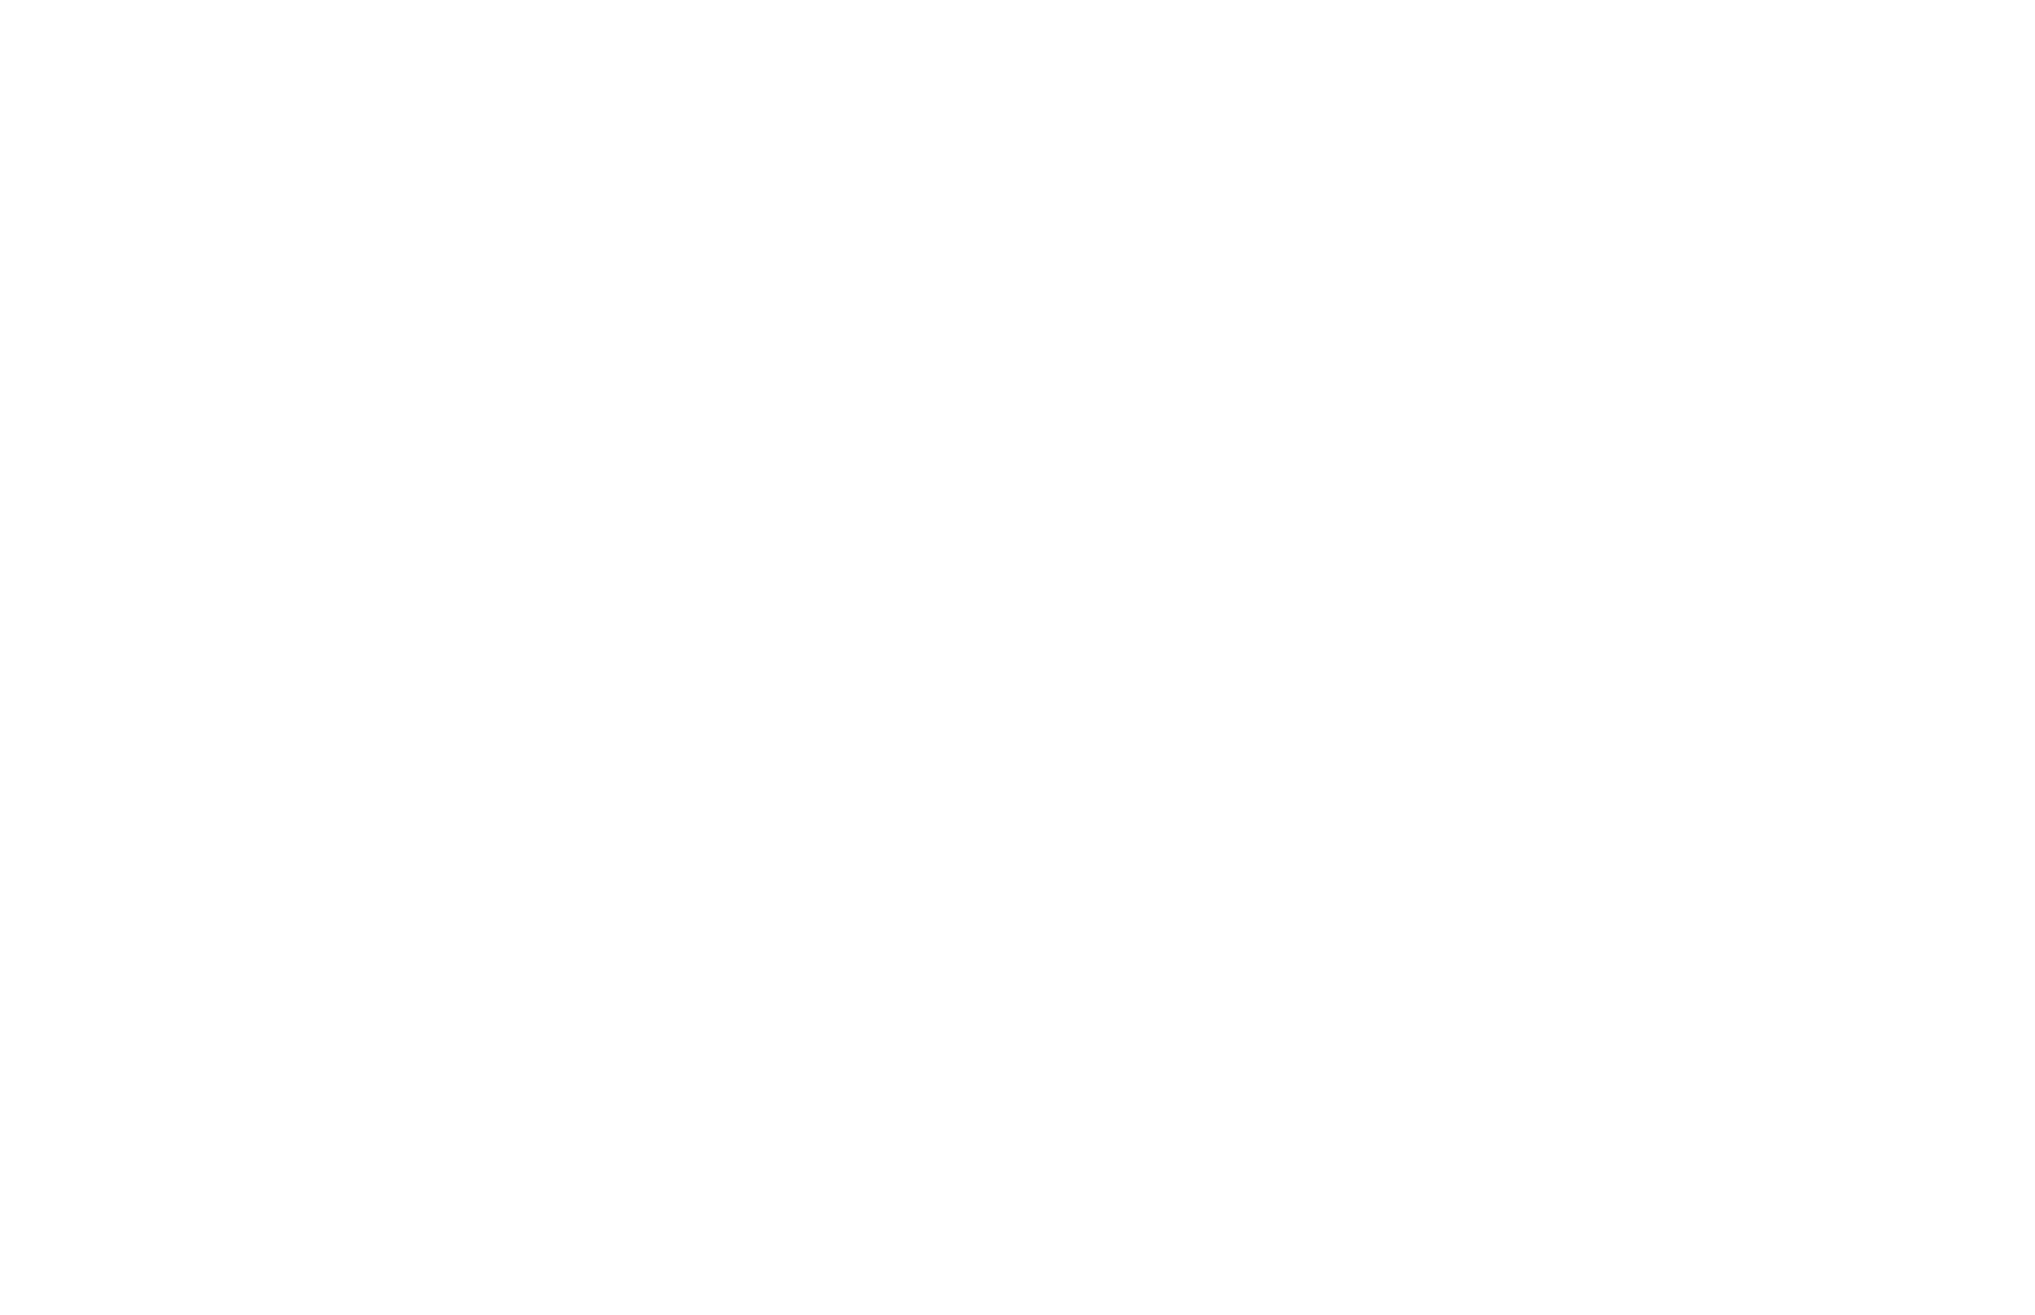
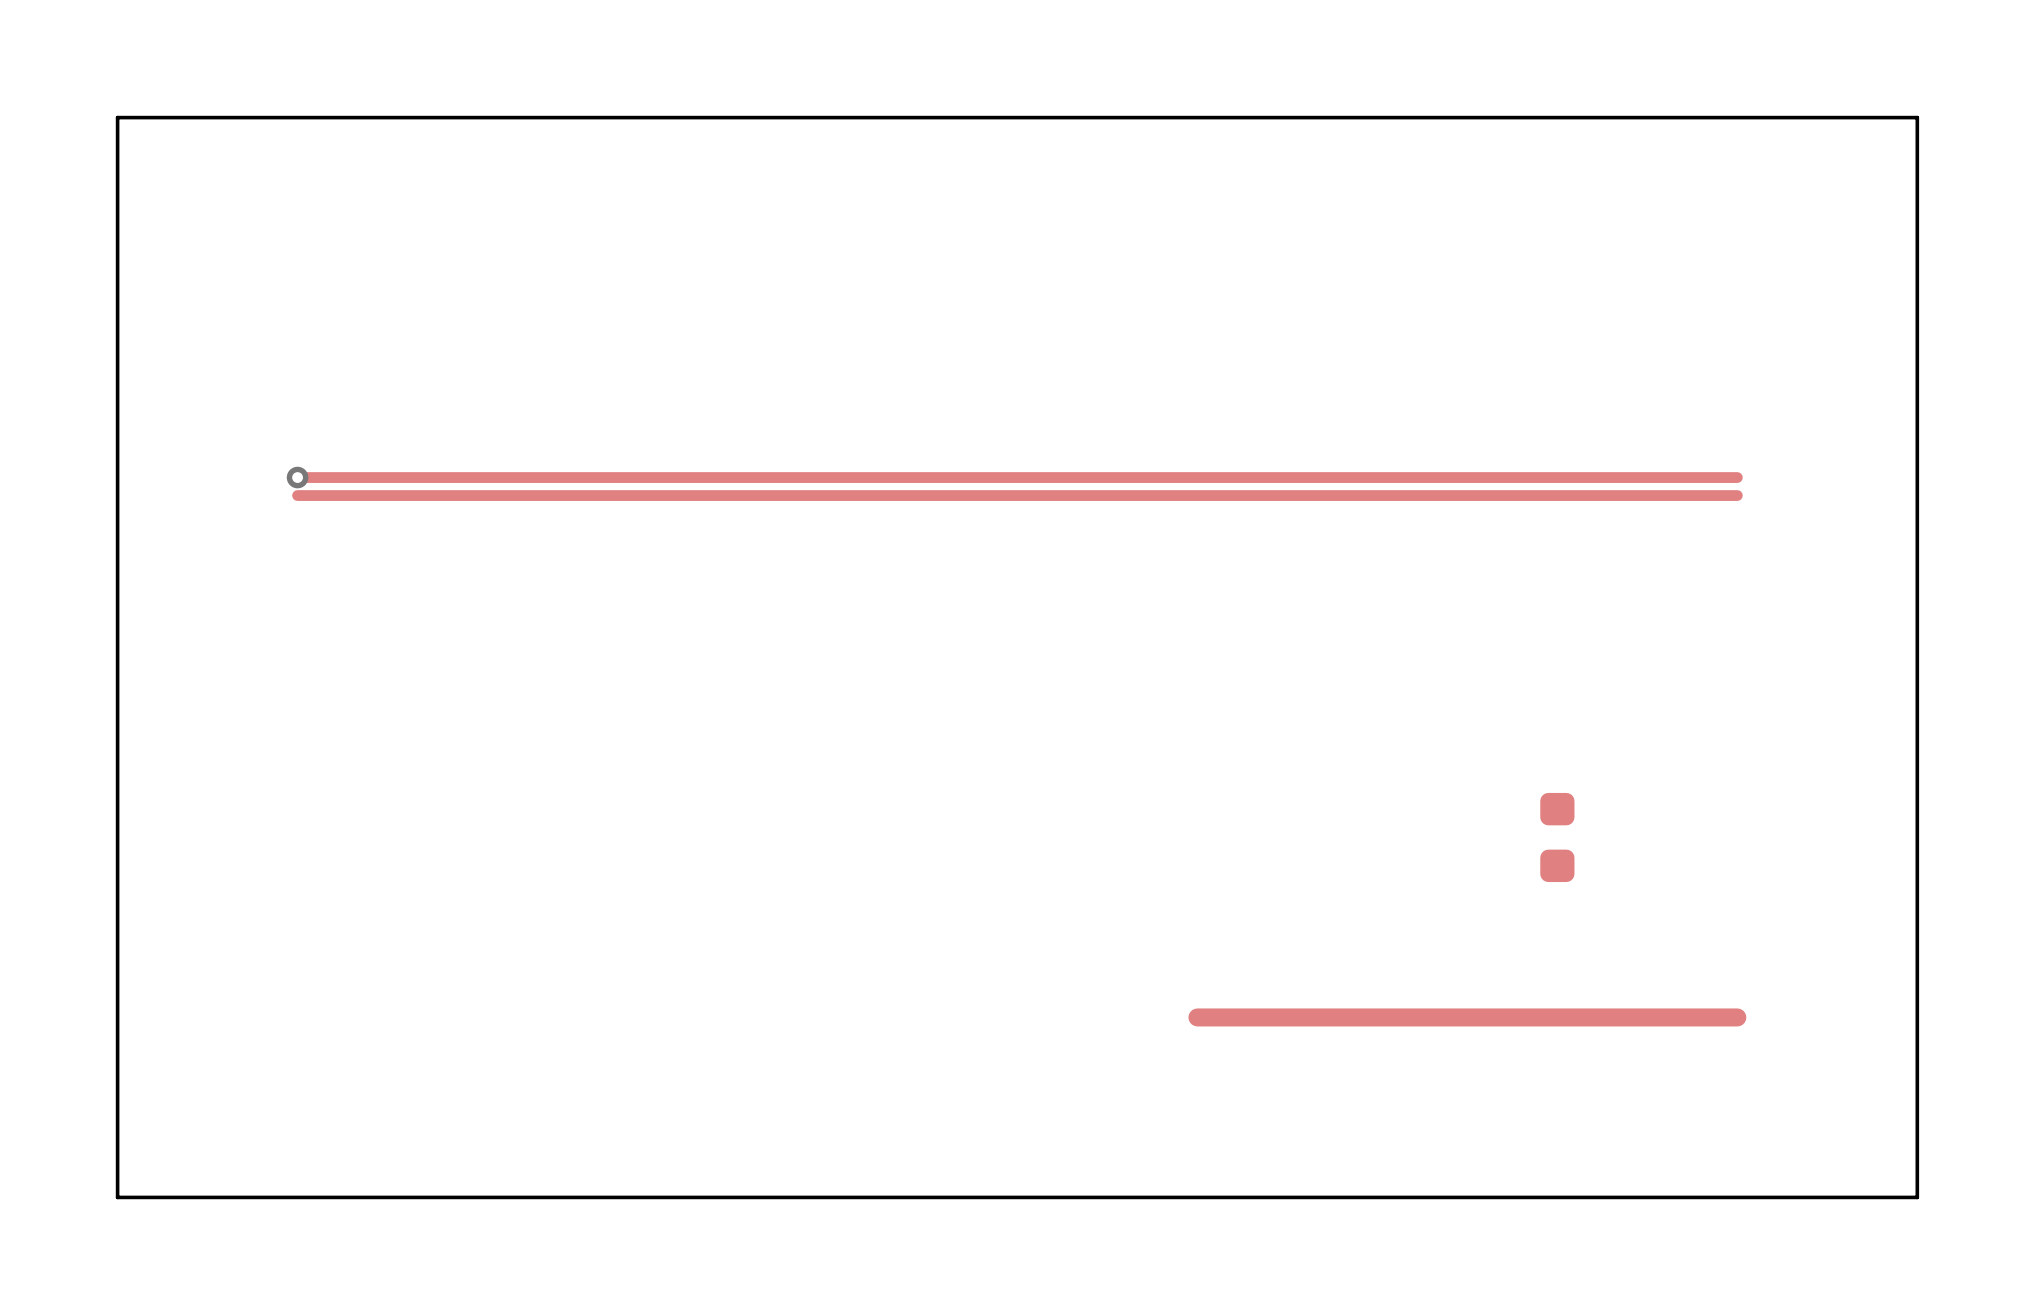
board edge: none -> (1917, 117) (117, 117) (117, 1197) (1917, 1197) (1917, 117)
via: none -> (297, 477)
top track: none -> (1737, 477) (297, 477)
top track: none -> (1737, 495) (297, 495)
part: none -> (1557, 837)
top track: none -> (1737, 1017) (1197, 1017)

